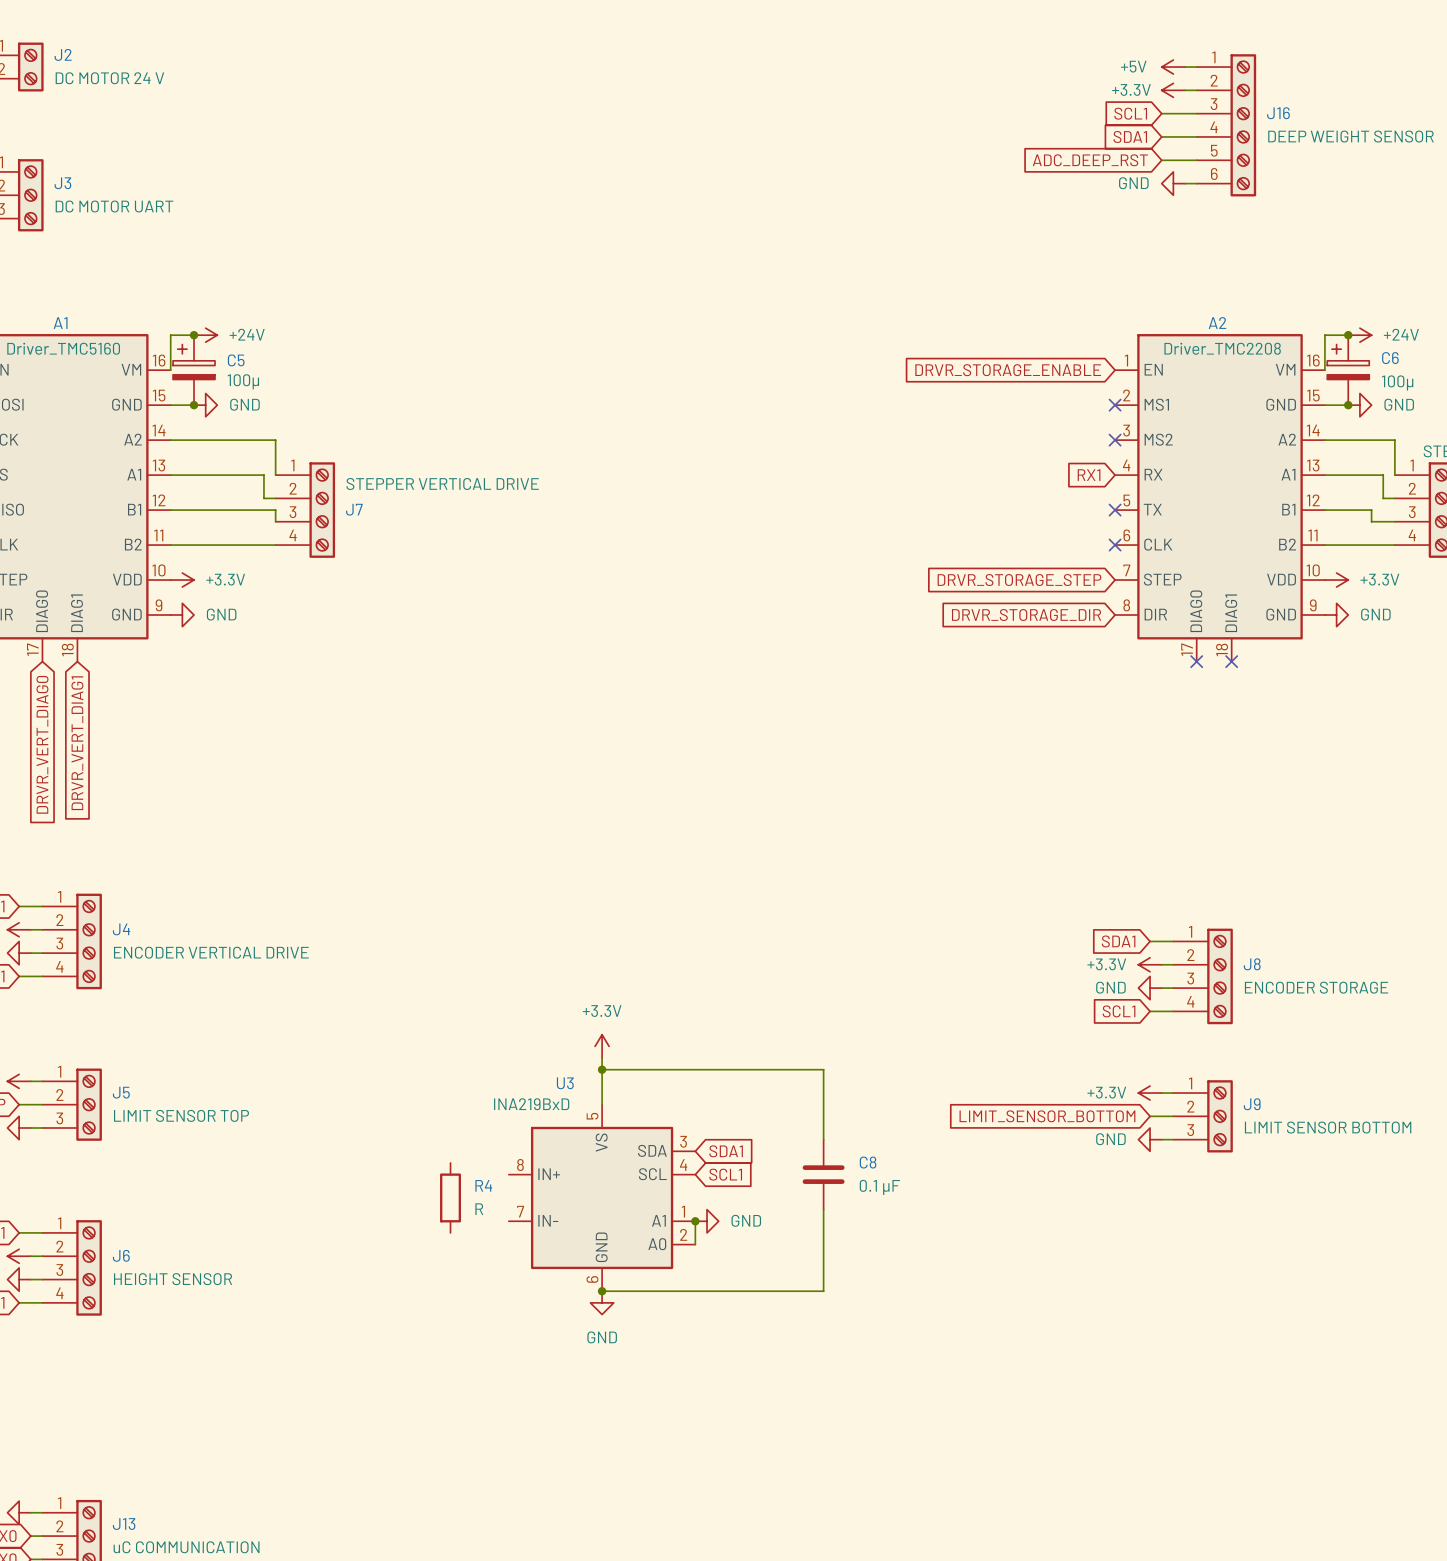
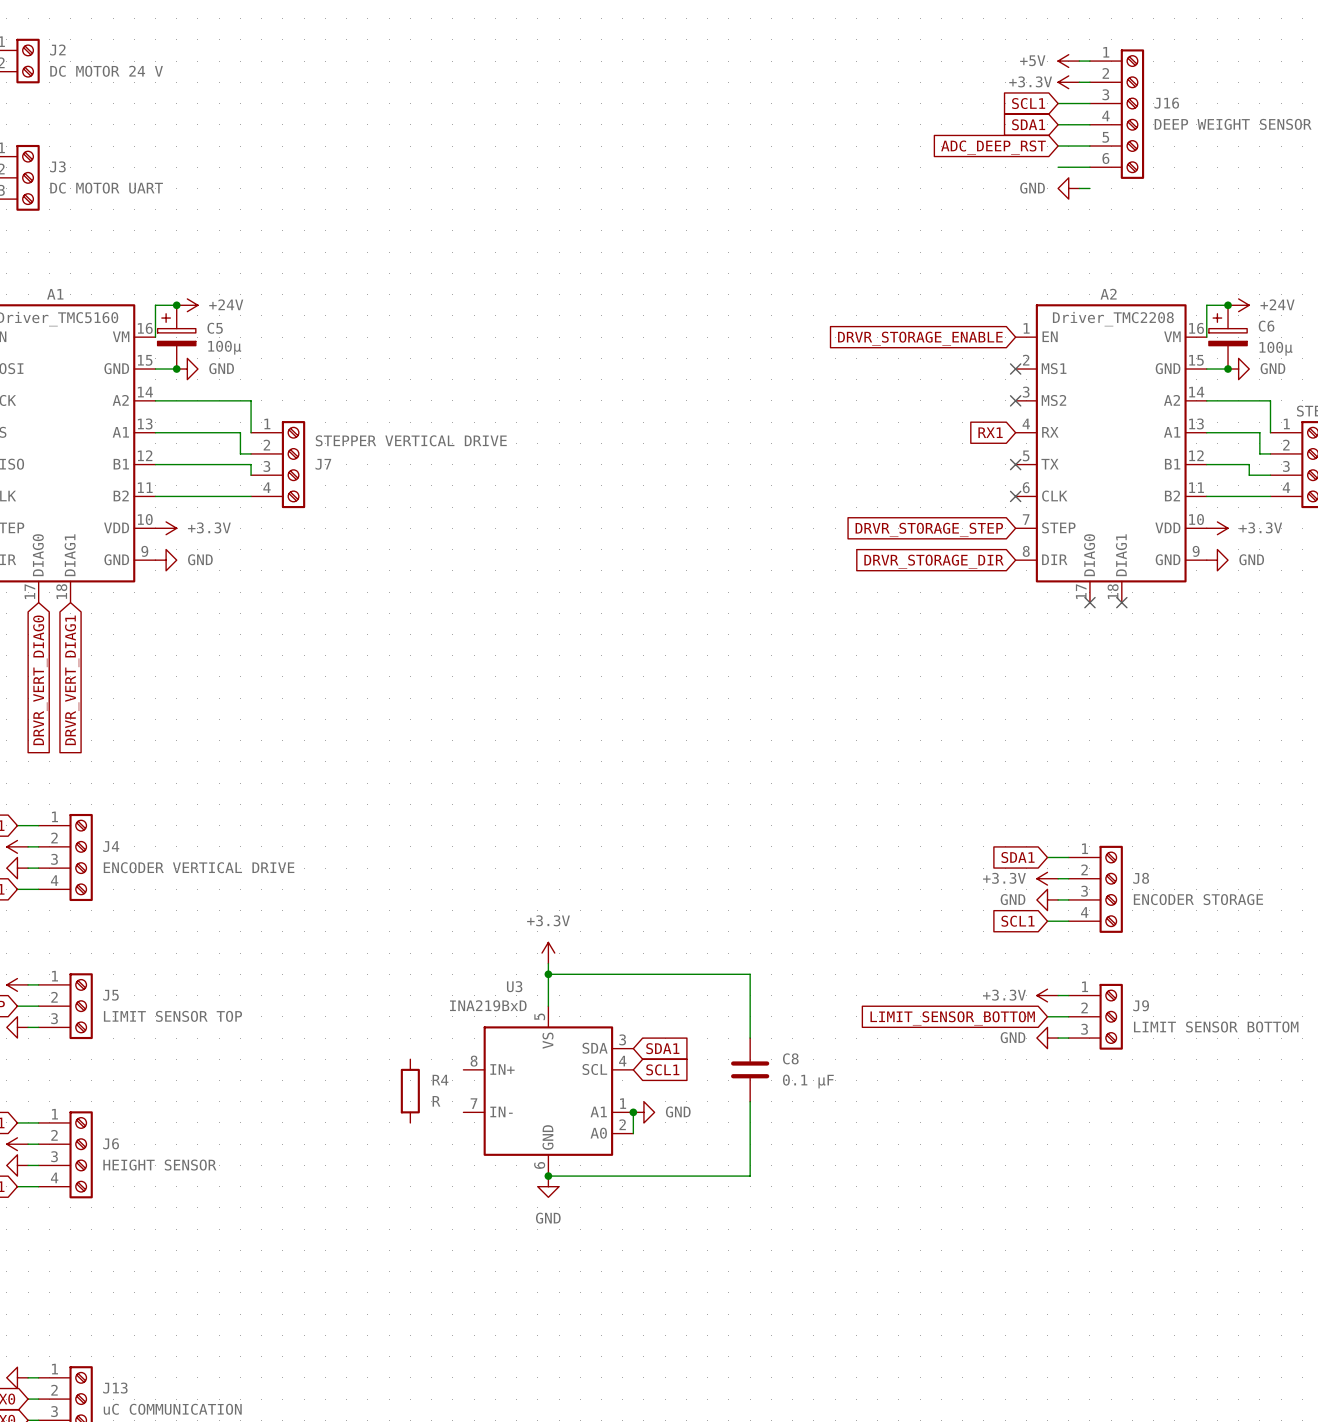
power symbol position: GND (1173, 183) -> GND (1068, 188)
wire: none -> (1079, 188) (1089, 188)

